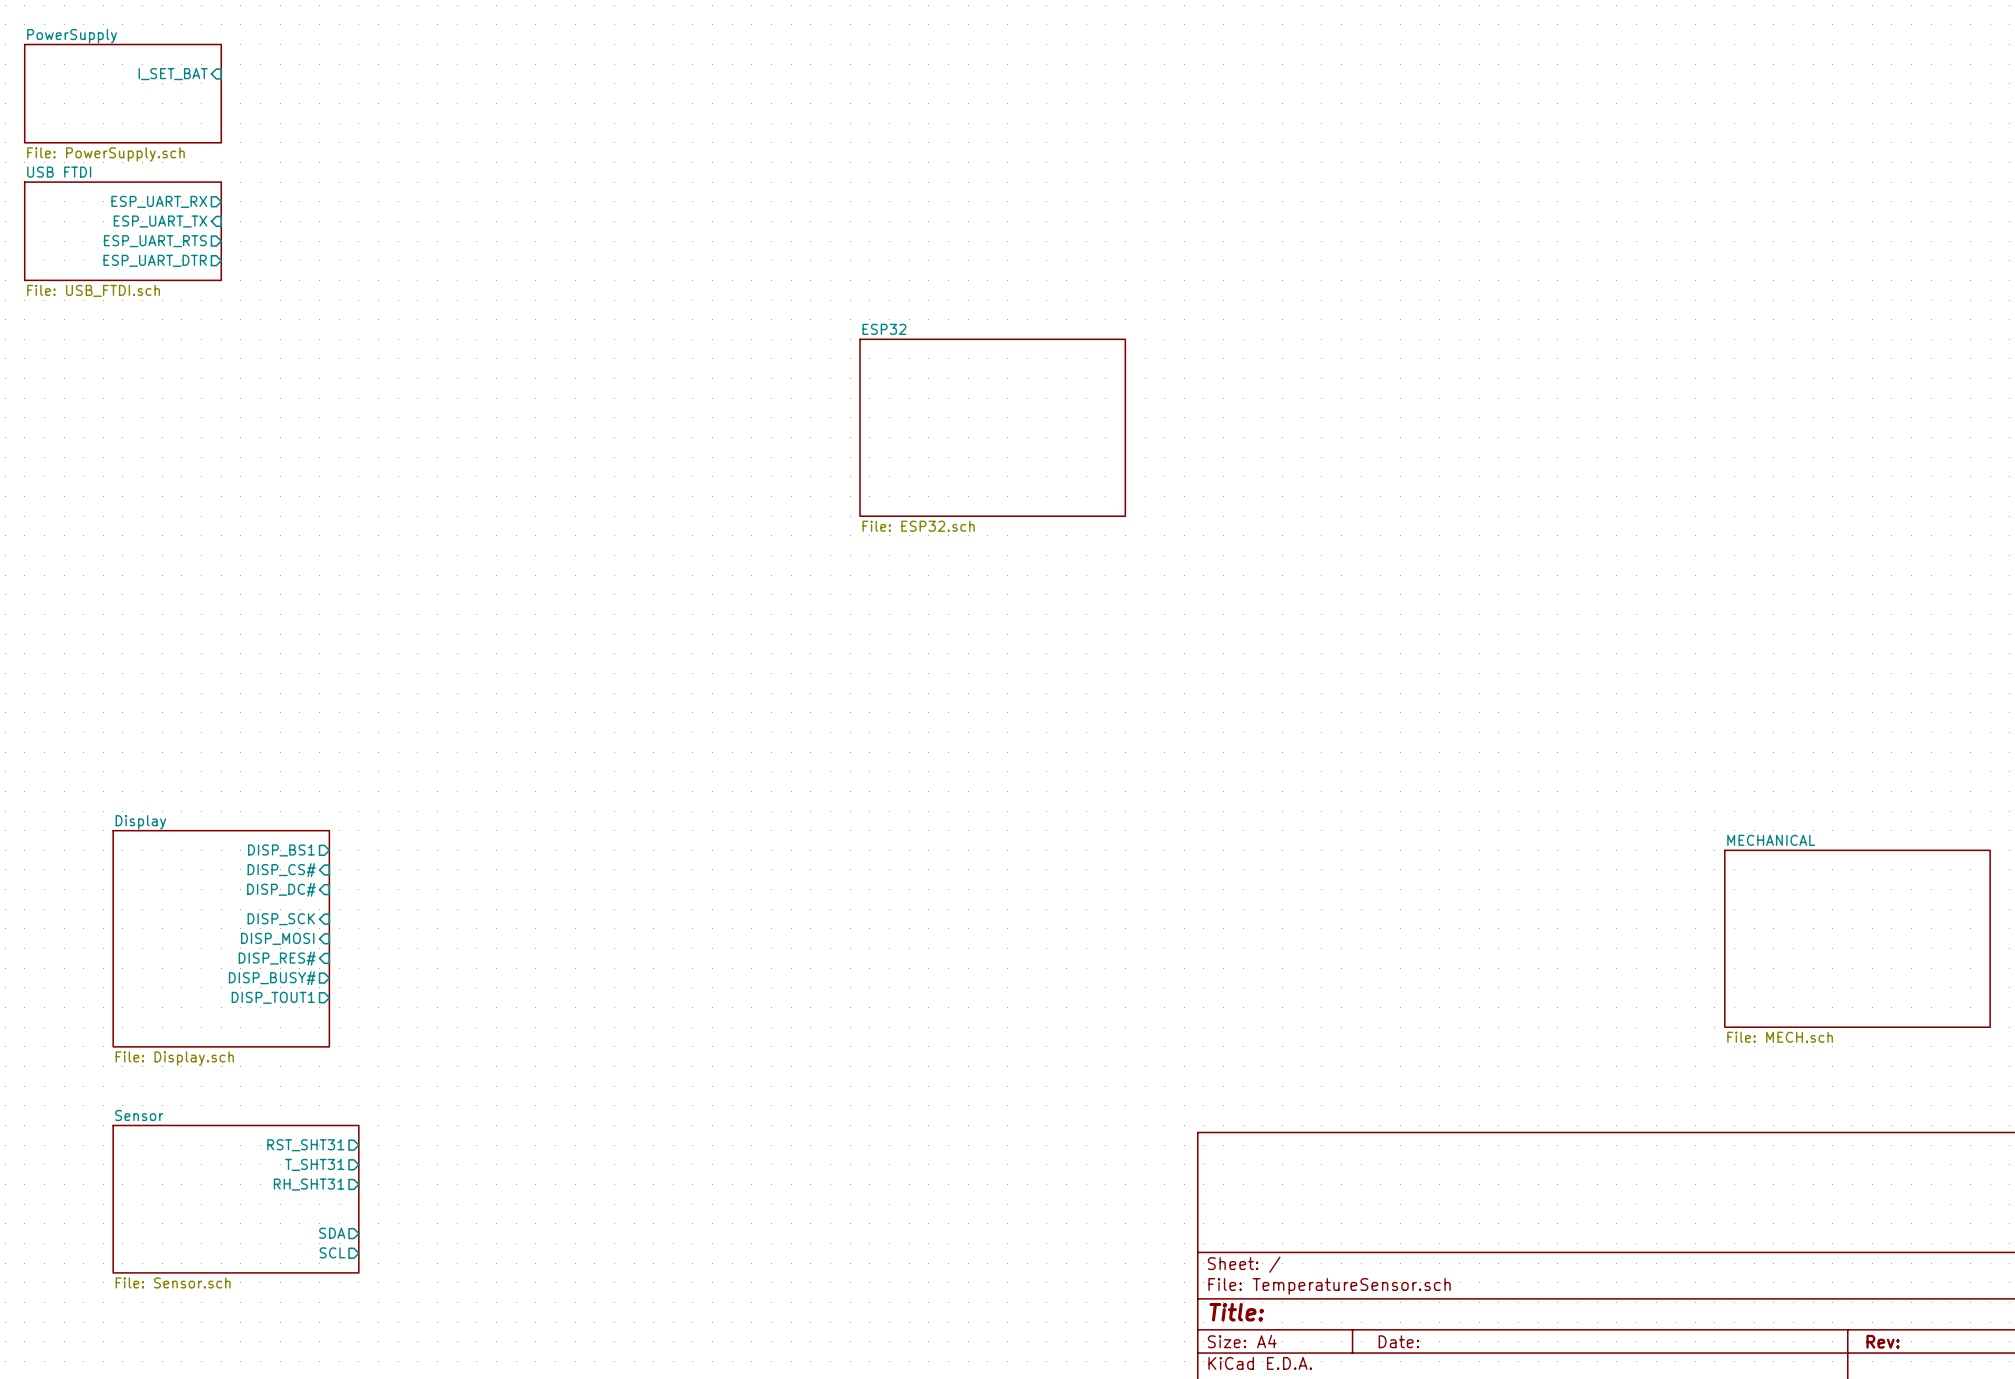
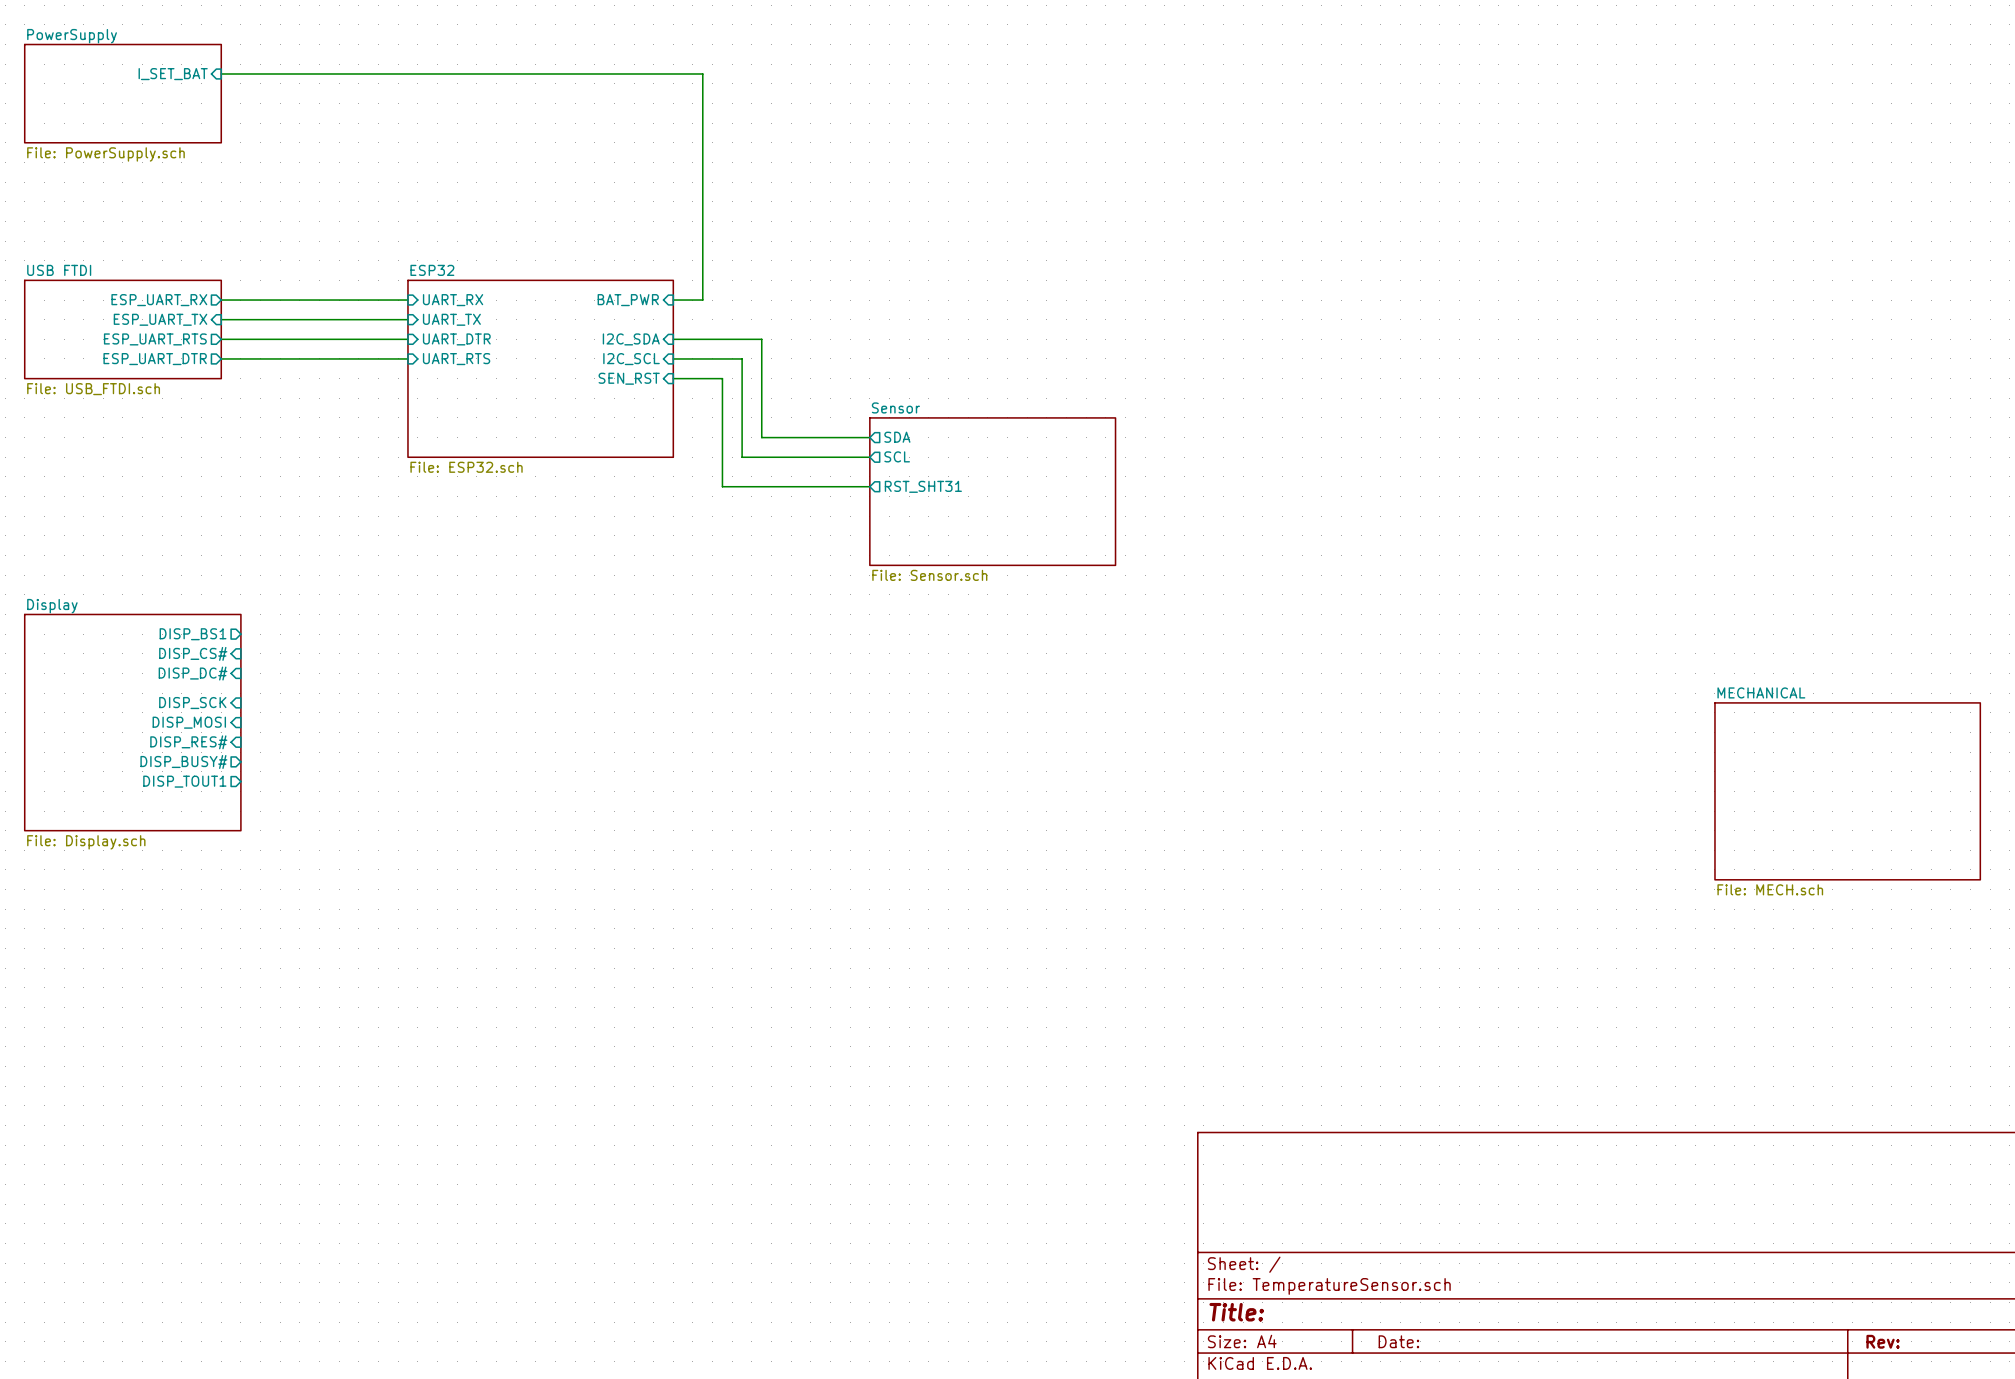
wire: none -> (221, 73) (702, 73) (702, 300) (673, 300)
sheet pin position: ESP_UART_RX (159, 201) -> ESP_UART_RX (159, 300)
sheet pin position: ESP_UART_TX (160, 221) -> ESP_UART_TX (160, 319)
sheet USB FTDI position: (122, 231) -> (122, 329)
sheet pin position: ESP_UART_RTS (155, 241) -> ESP_UART_RTS (155, 339)
sheet pin position: ESP_UART_DTR (155, 260) -> ESP_UART_DTR (155, 359)
wire: none -> (221, 300) (407, 300)
sheet pin: none -> UART_RX (453, 300)
sheet pin: none -> BAT_PWR (628, 300)
wire: none -> (221, 319) (407, 319)
sheet pin: none -> UART_TX (451, 319)
wire: none -> (221, 339) (407, 339)
sheet pin: none -> UART_DTR (456, 339)
sheet pin: none -> I2C_SDA (631, 339)
wire: none -> (673, 339) (761, 339) (761, 437) (869, 437)
wire: none -> (221, 358) (407, 358)
wire: none -> (673, 358) (742, 358) (742, 457) (869, 457)
sheet pin: none -> UART_RTS (456, 359)
sheet pin: none -> I2C_SCL (631, 359)
sheet pin: none -> SEN_RST (629, 378)
wire: none -> (673, 378) (722, 378) (722, 486) (869, 486)
sheet ESP32 position: (992, 427) -> (540, 368)
sheet pin: none -> SDA (897, 437)
sheet pin: none -> SCL (897, 456)
sheet pin: none -> RST_SHT31 (923, 486)
sheet Sensor: none -> File: Sensor.sch (992, 491)
sheet pin: none -> DISP_BS1 (193, 634)
sheet pin: none -> DISP_CS# (193, 653)
sheet pin: none -> DISP_DC# (193, 673)
sheet pin: none -> DISP_SCK (192, 703)
sheet Display: none -> File: Display.sch (132, 722)
sheet pin: none -> DISP_MOSI (189, 722)
sheet pin: none -> DISP_RES# (188, 742)
sheet pin: none -> DISP_BUSY# (183, 761)
sheet pin: none -> DISP_TOUT1 (184, 781)
sheet pin: DISP_BS1 (281, 850) -> none
sheet pin: DISP_CS# (281, 870) -> none
sheet pin: DISP_DC# (281, 889) -> none
sheet pin: DISP_SCK (281, 919) -> none
sheet Display: File: Display.sch (221, 938) -> none
sheet pin: DISP_MOSI (277, 938) -> none
sheet MECHANICAL position: (1857, 938) -> (1847, 791)
sheet pin: DISP_RES# (277, 958) -> none
sheet pin: DISP_BUSY# (272, 978) -> none
sheet pin: DISP_TOUT1 (273, 997) -> none
sheet pin: RST_SHT31 (305, 1145) -> none
sheet pin: T_SHT31 (314, 1164) -> none
sheet pin: RH_SHT31 (309, 1184) -> none
sheet Sensor: File: Sensor.sch (236, 1199) -> none
sheet pin: SDA (332, 1233) -> none
sheet pin: SCL (332, 1252) -> none

